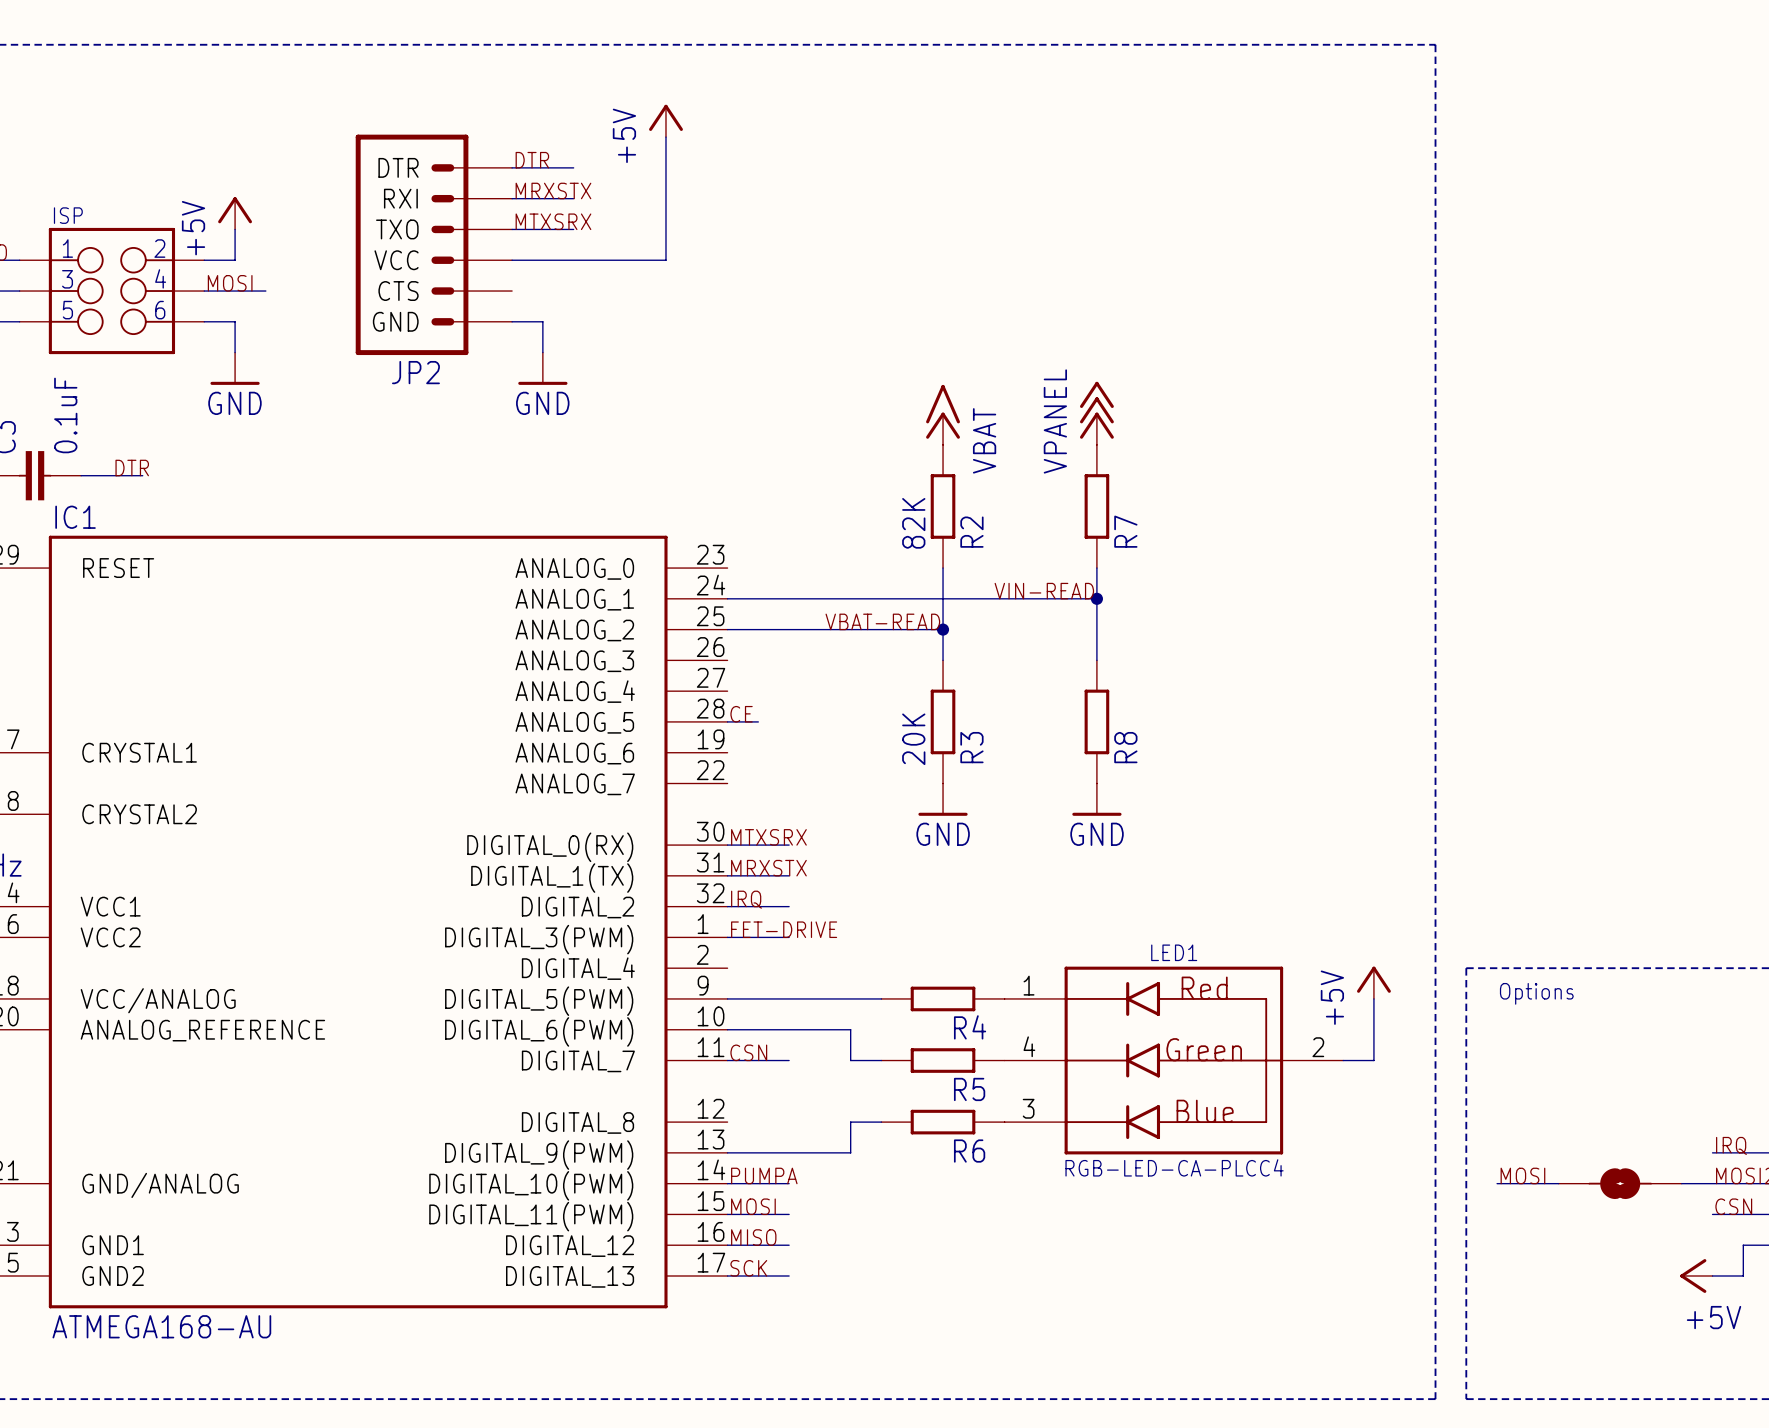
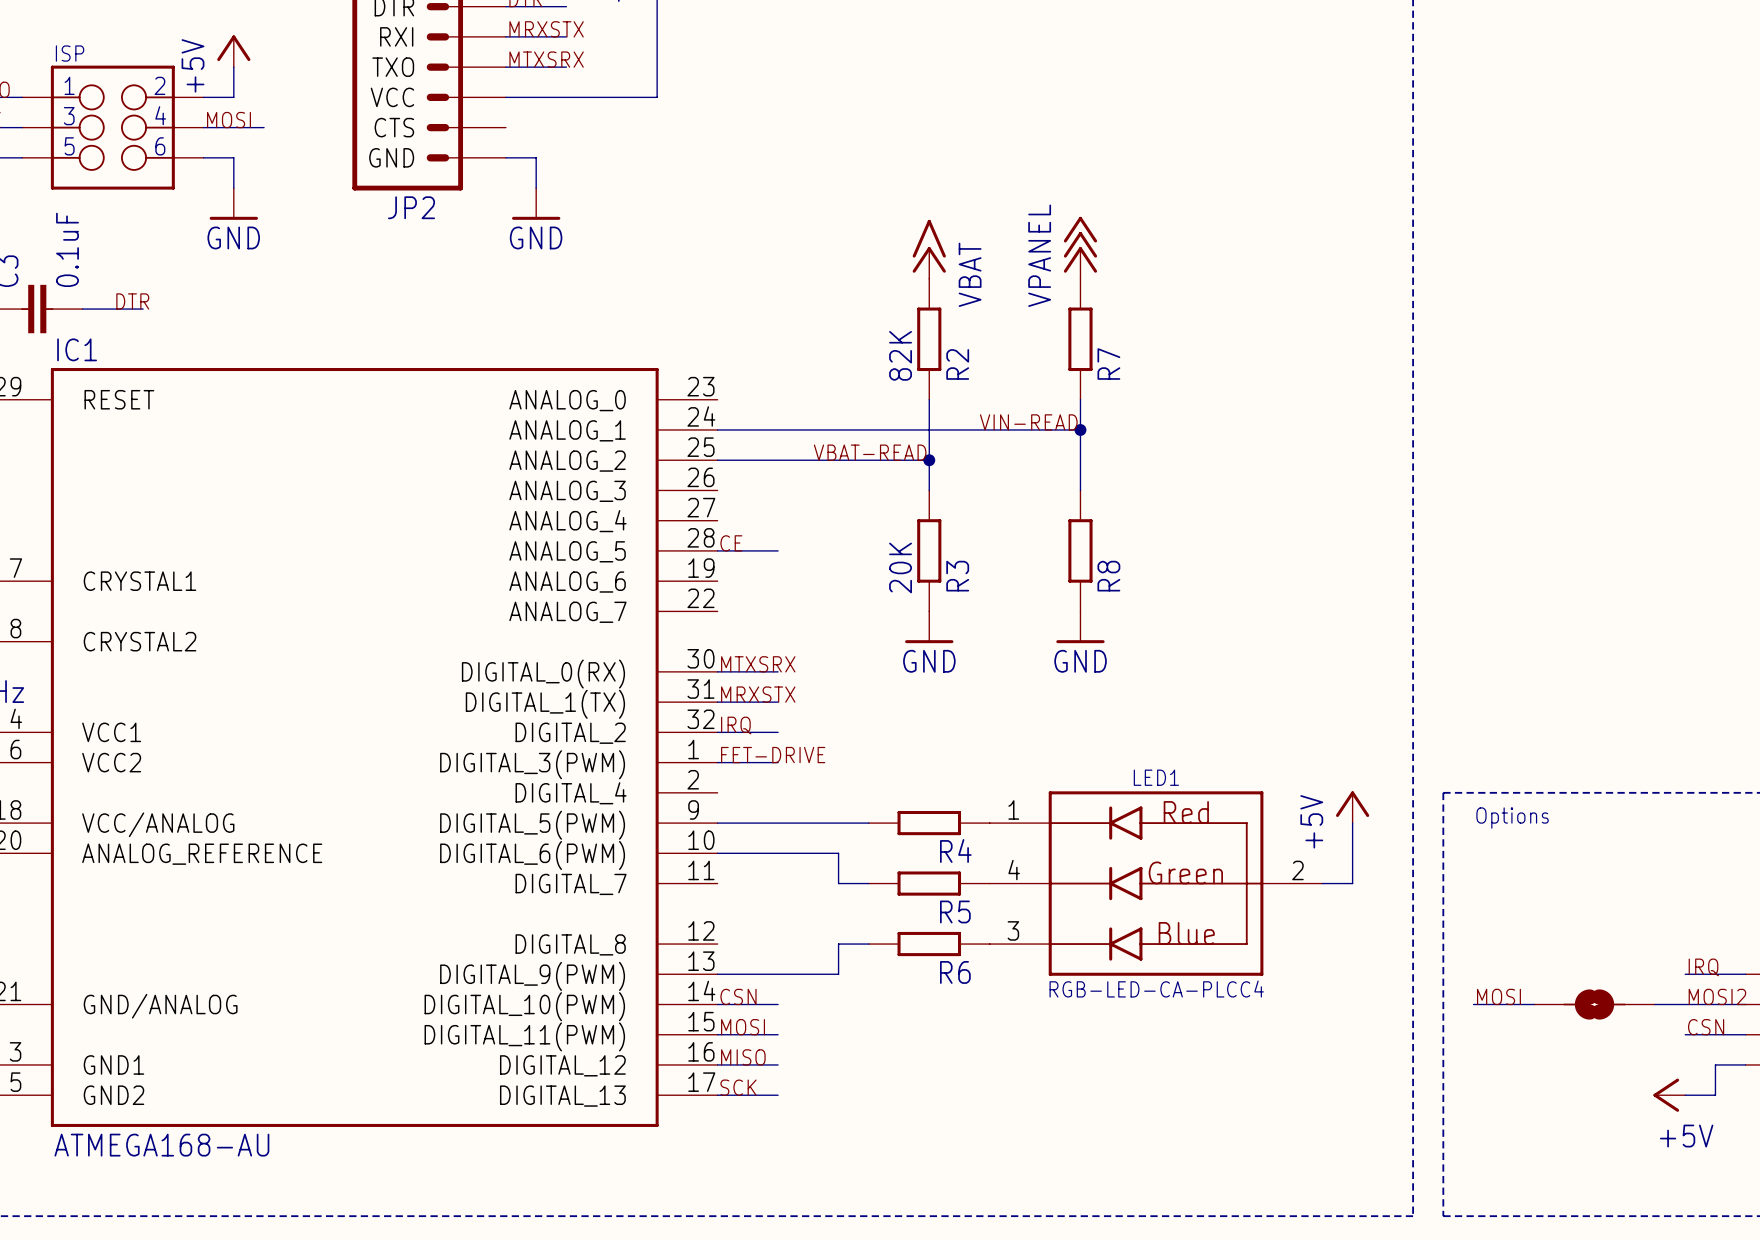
wire: none -> (747, 550) (778, 550)
label: CSN (748, 1052) -> none
wire: (727, 1060) (789, 1060) -> none
label: PUMPA (764, 1175) -> CSN (738, 996)

